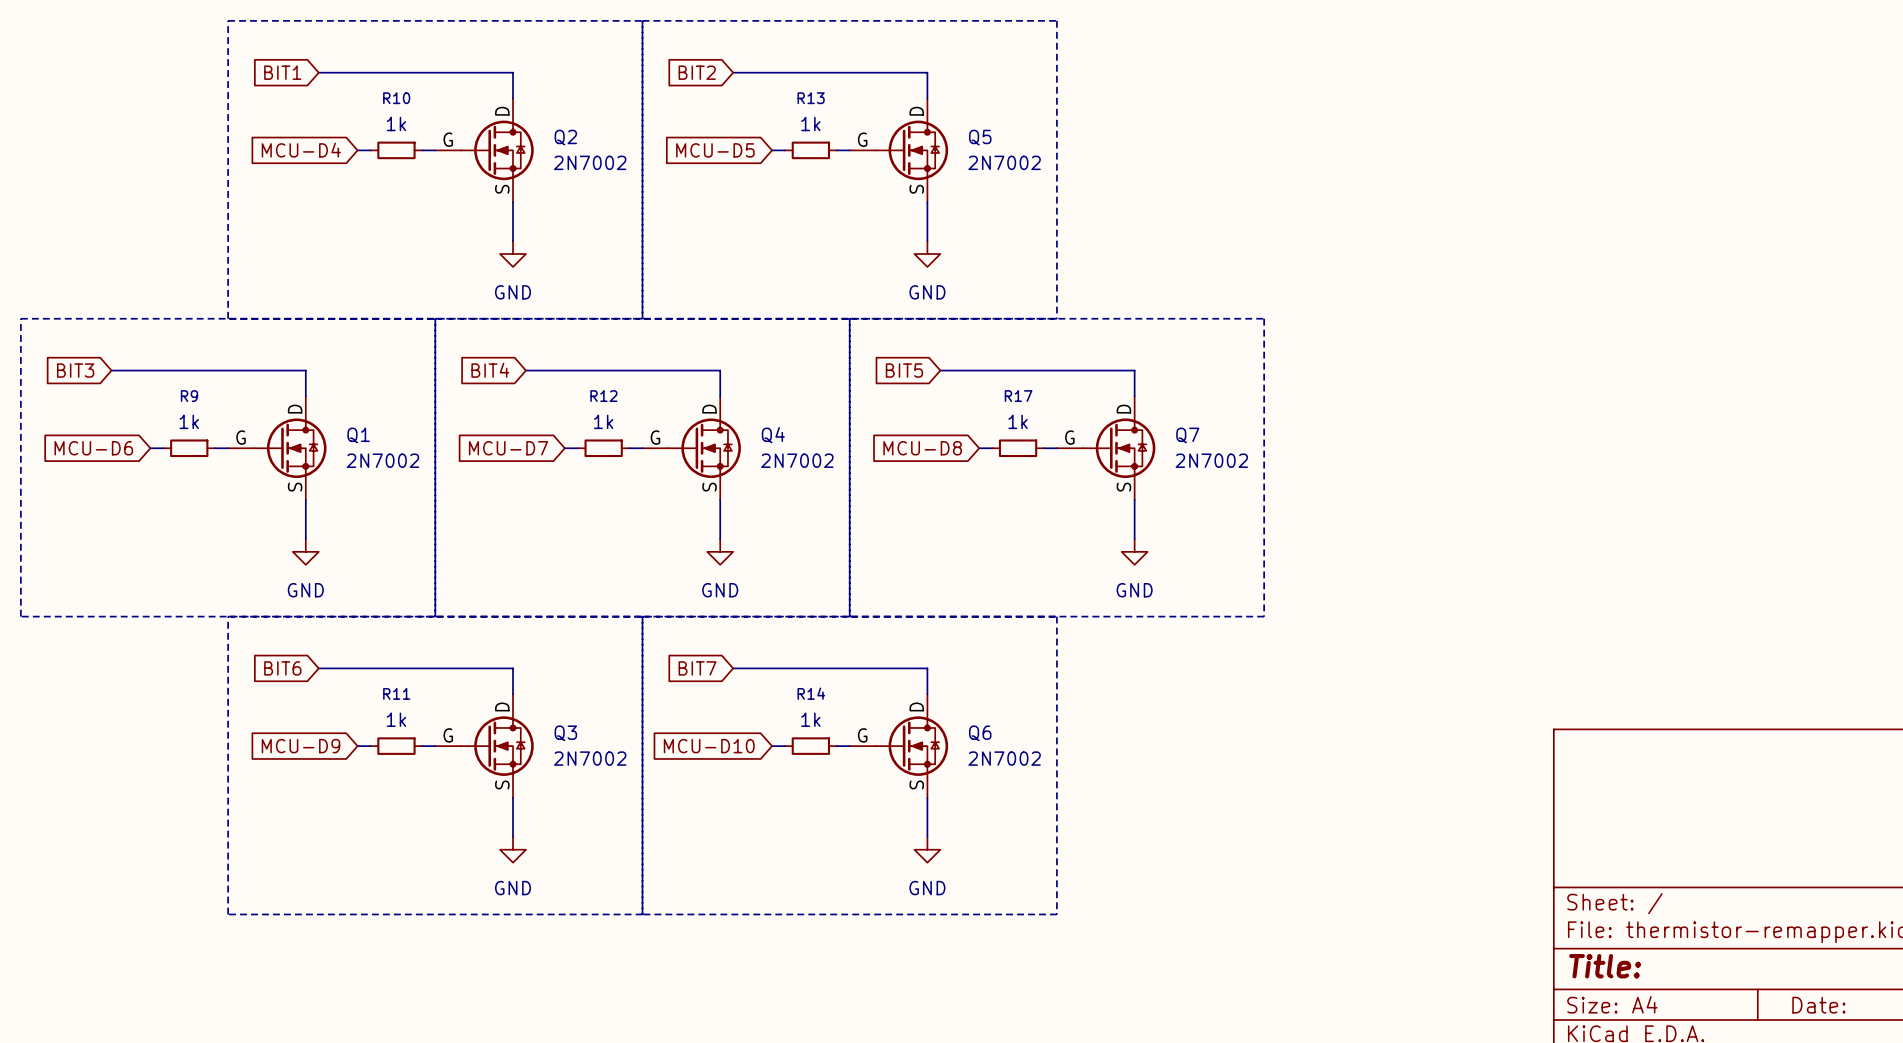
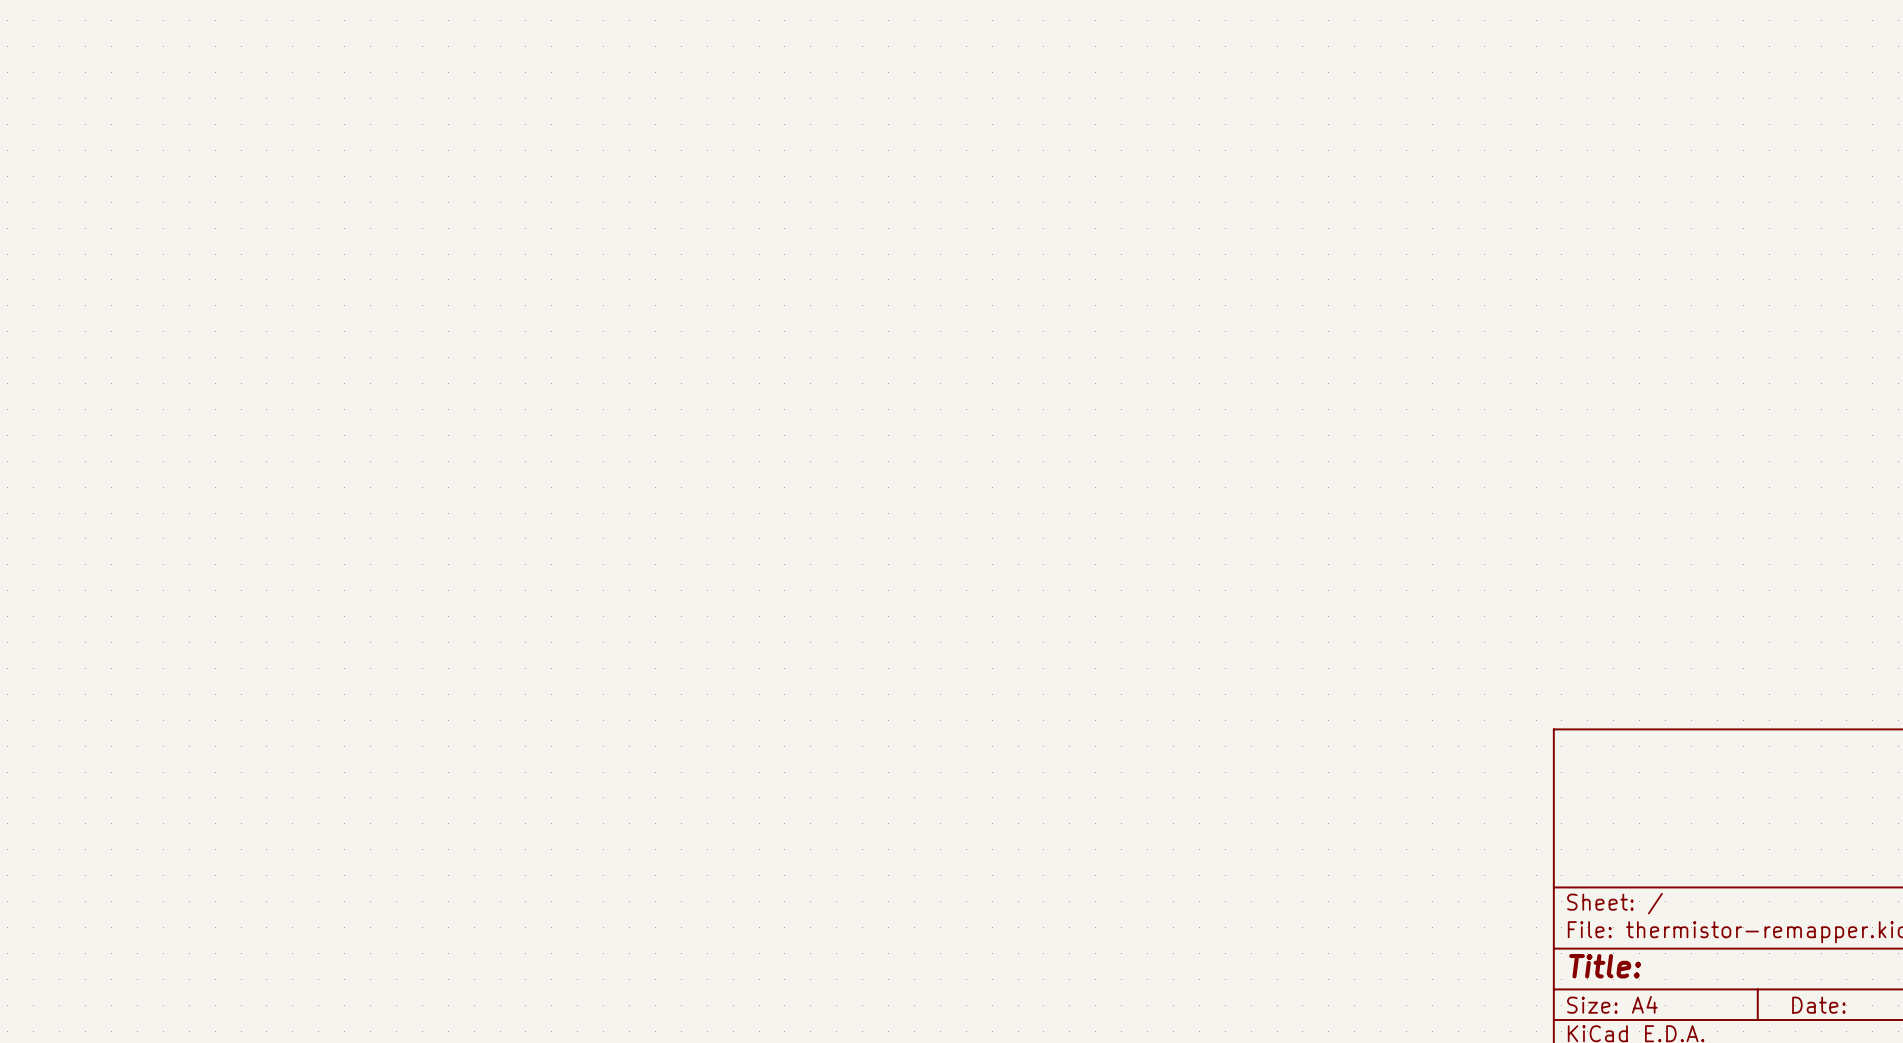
line: (642, 20) (642, 318) -> none
global label: BIT1 (282, 72) -> none
wire: (318, 72) (513, 72) (513, 98) -> none
global label: BIT2 (697, 72) -> none
wire: (733, 72) (927, 72) (927, 98) -> none
global label: MCU-D4 (301, 150) -> none
wire: (357, 150) (370, 150) -> none
R10: 1k (396, 150) -> none
wire: (422, 150) (435, 150) -> none
Q2: 2N7002 (484, 150) -> none
global label: MCU-D5 (715, 150) -> none
wire: (772, 150) (784, 150) -> none
R13: 1k (810, 150) -> none
wire: (836, 150) (849, 150) -> none
Q5: 2N7002 (898, 150) -> none
wire: (513, 202) (513, 241) -> none
wire: (927, 202) (927, 241) -> none
power symbol: GND (513, 254) -> none
power symbol: GND (927, 254) -> none
line: (20, 318) (1264, 318) (1264, 616) (20, 616) (20, 318) -> none
line: (228, 318) (228, 20) (1056, 20) (1056, 318) -> none
line: (435, 318) (435, 616) -> none
line: (849, 318) (849, 616) -> none
global label: BIT3 (75, 370) -> none
wire: (111, 370) (305, 370) (305, 396) -> none
global label: BIT4 (490, 370) -> none
wire: (525, 370) (720, 370) (720, 396) -> none
global label: BIT5 (904, 370) -> none
wire: (940, 370) (1134, 370) (1134, 396) -> none
global label: MCU-D6 (93, 448) -> none
wire: (150, 448) (163, 448) -> none
R9: 1k (189, 448) -> none
wire: (215, 448) (228, 448) -> none
Q1: 2N7002 (277, 448) -> none
global label: MCU-D7 (508, 448) -> none
wire: (564, 448) (577, 448) -> none
R12: 1k (603, 448) -> none
wire: (629, 448) (642, 448) -> none
Q4: 2N7002 (691, 448) -> none
global label: MCU-D8 (922, 448) -> none
wire: (979, 448) (992, 448) -> none
R17: 1k (1018, 448) -> none
wire: (1043, 448) (1056, 448) -> none
Q7: 2N7002 (1106, 448) -> none
wire: (305, 500) (305, 538) -> none
wire: (720, 500) (720, 538) -> none
wire: (1134, 500) (1134, 538) -> none
power symbol: GND (305, 551) -> none
power symbol: GND (720, 551) -> none
power symbol: GND (1134, 551) -> none
line: (228, 616) (228, 914) (1056, 914) (1056, 616) -> none
line: (642, 616) (642, 914) -> none
global label: BIT6 (282, 668) -> none
wire: (318, 668) (513, 668) (513, 694) -> none
global label: BIT7 (697, 668) -> none
wire: (733, 668) (927, 668) (927, 694) -> none
global label: MCU-D9 (301, 746) -> none
wire: (357, 746) (370, 746) -> none
R11: 1k (396, 746) -> none
wire: (422, 746) (435, 746) -> none
Q3: 2N7002 (484, 746) -> none
global label: MCU-D10 (709, 746) -> none
wire: (772, 746) (784, 746) -> none
R14: 1k (810, 746) -> none
wire: (836, 746) (849, 746) -> none
Q6: 2N7002 (898, 746) -> none
wire: (513, 797) (513, 836) -> none
wire: (927, 797) (927, 836) -> none
power symbol: GND (513, 849) -> none
power symbol: GND (927, 849) -> none

